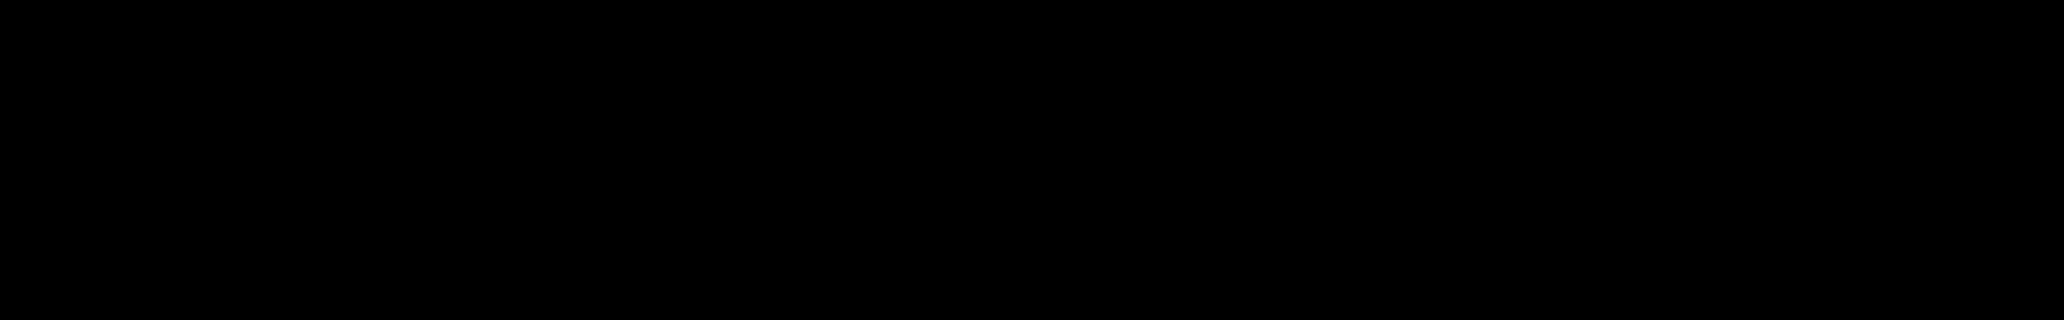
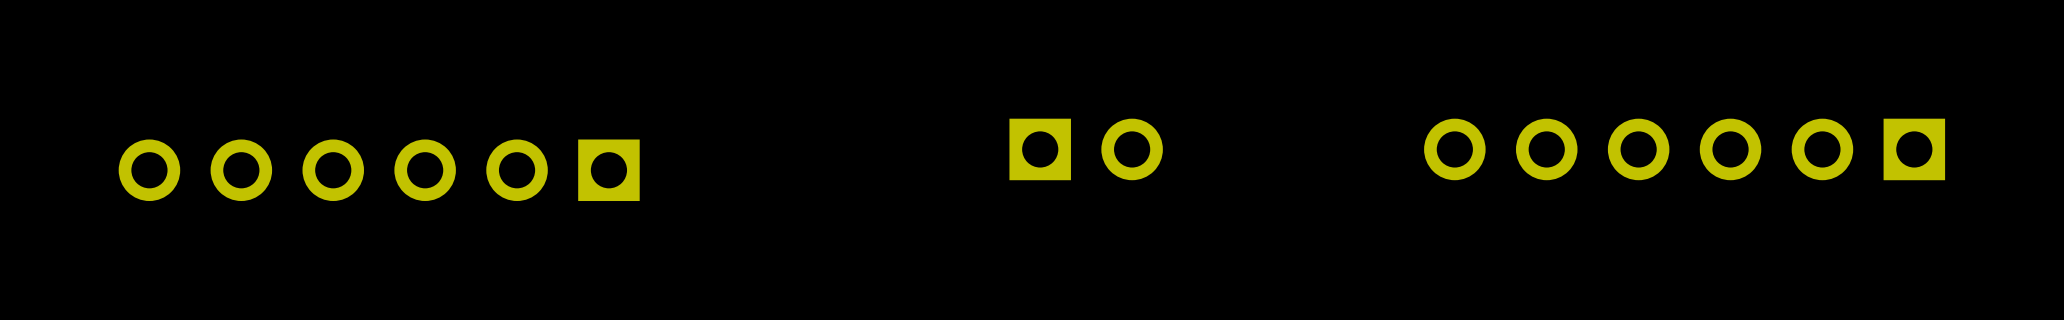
part: none -> (1086, 149)
part: none -> (1684, 149)
part: none -> (379, 170)

